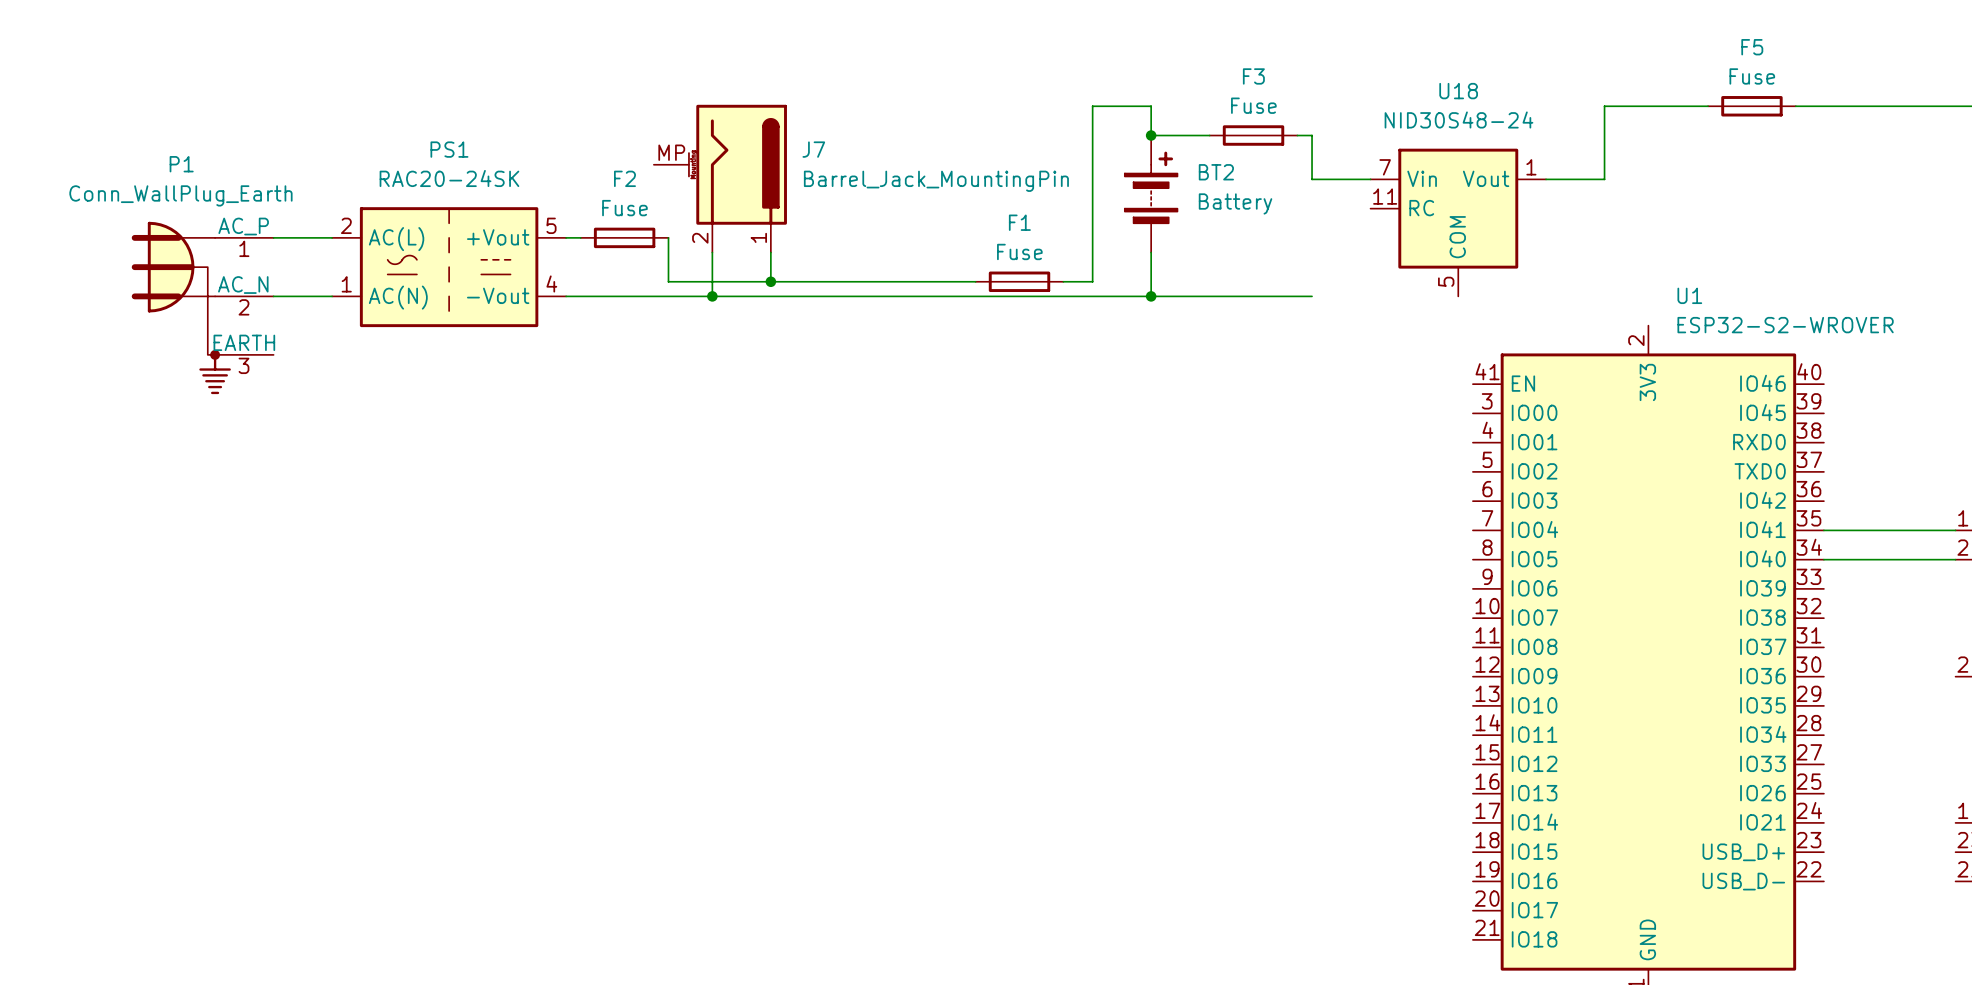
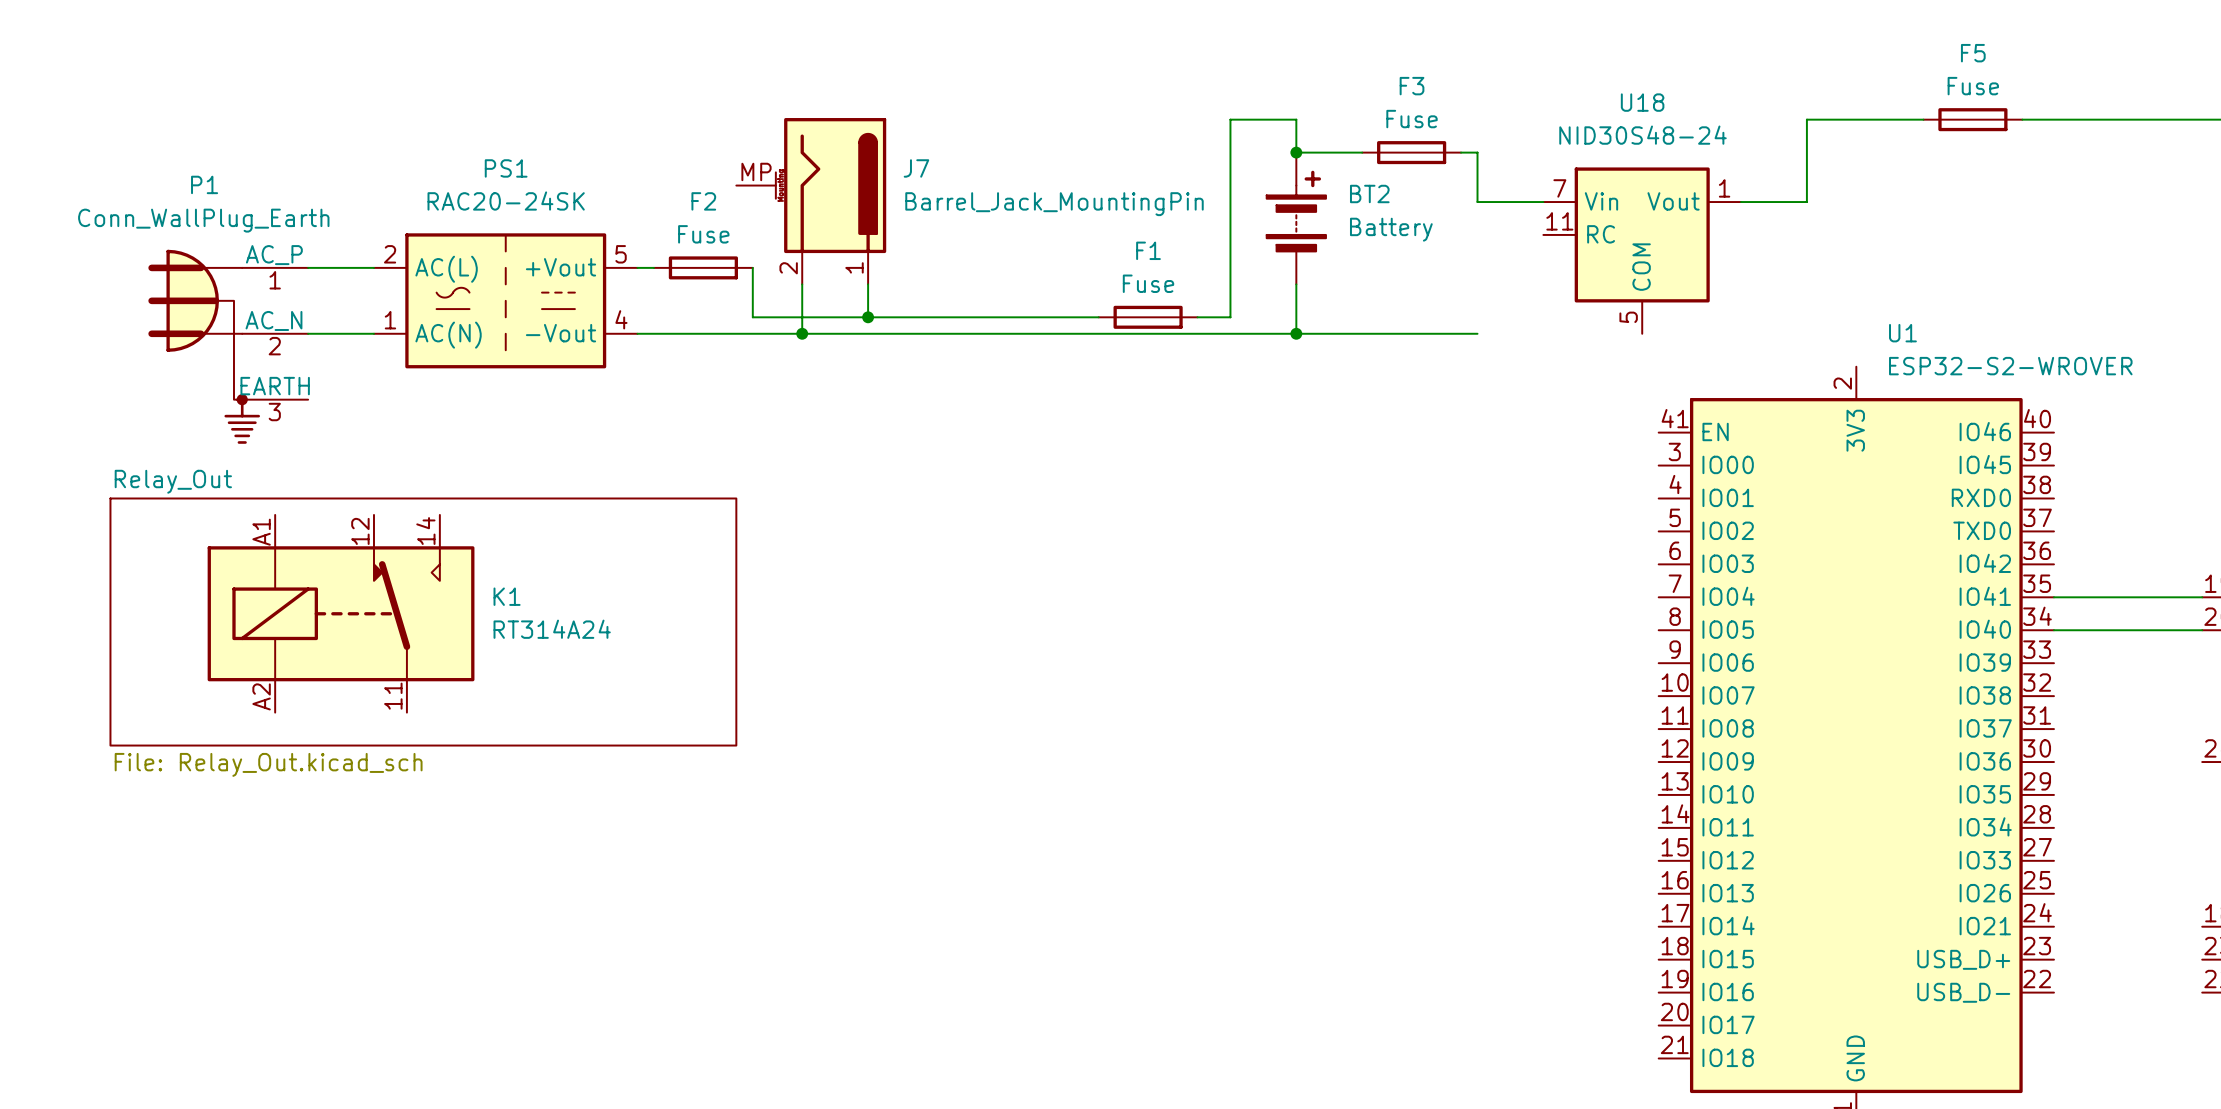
K1: none -> RT314A24 (341, 613)
sheet Relay_Out: none -> File: Relay_Out.kicad_sch (423, 622)

